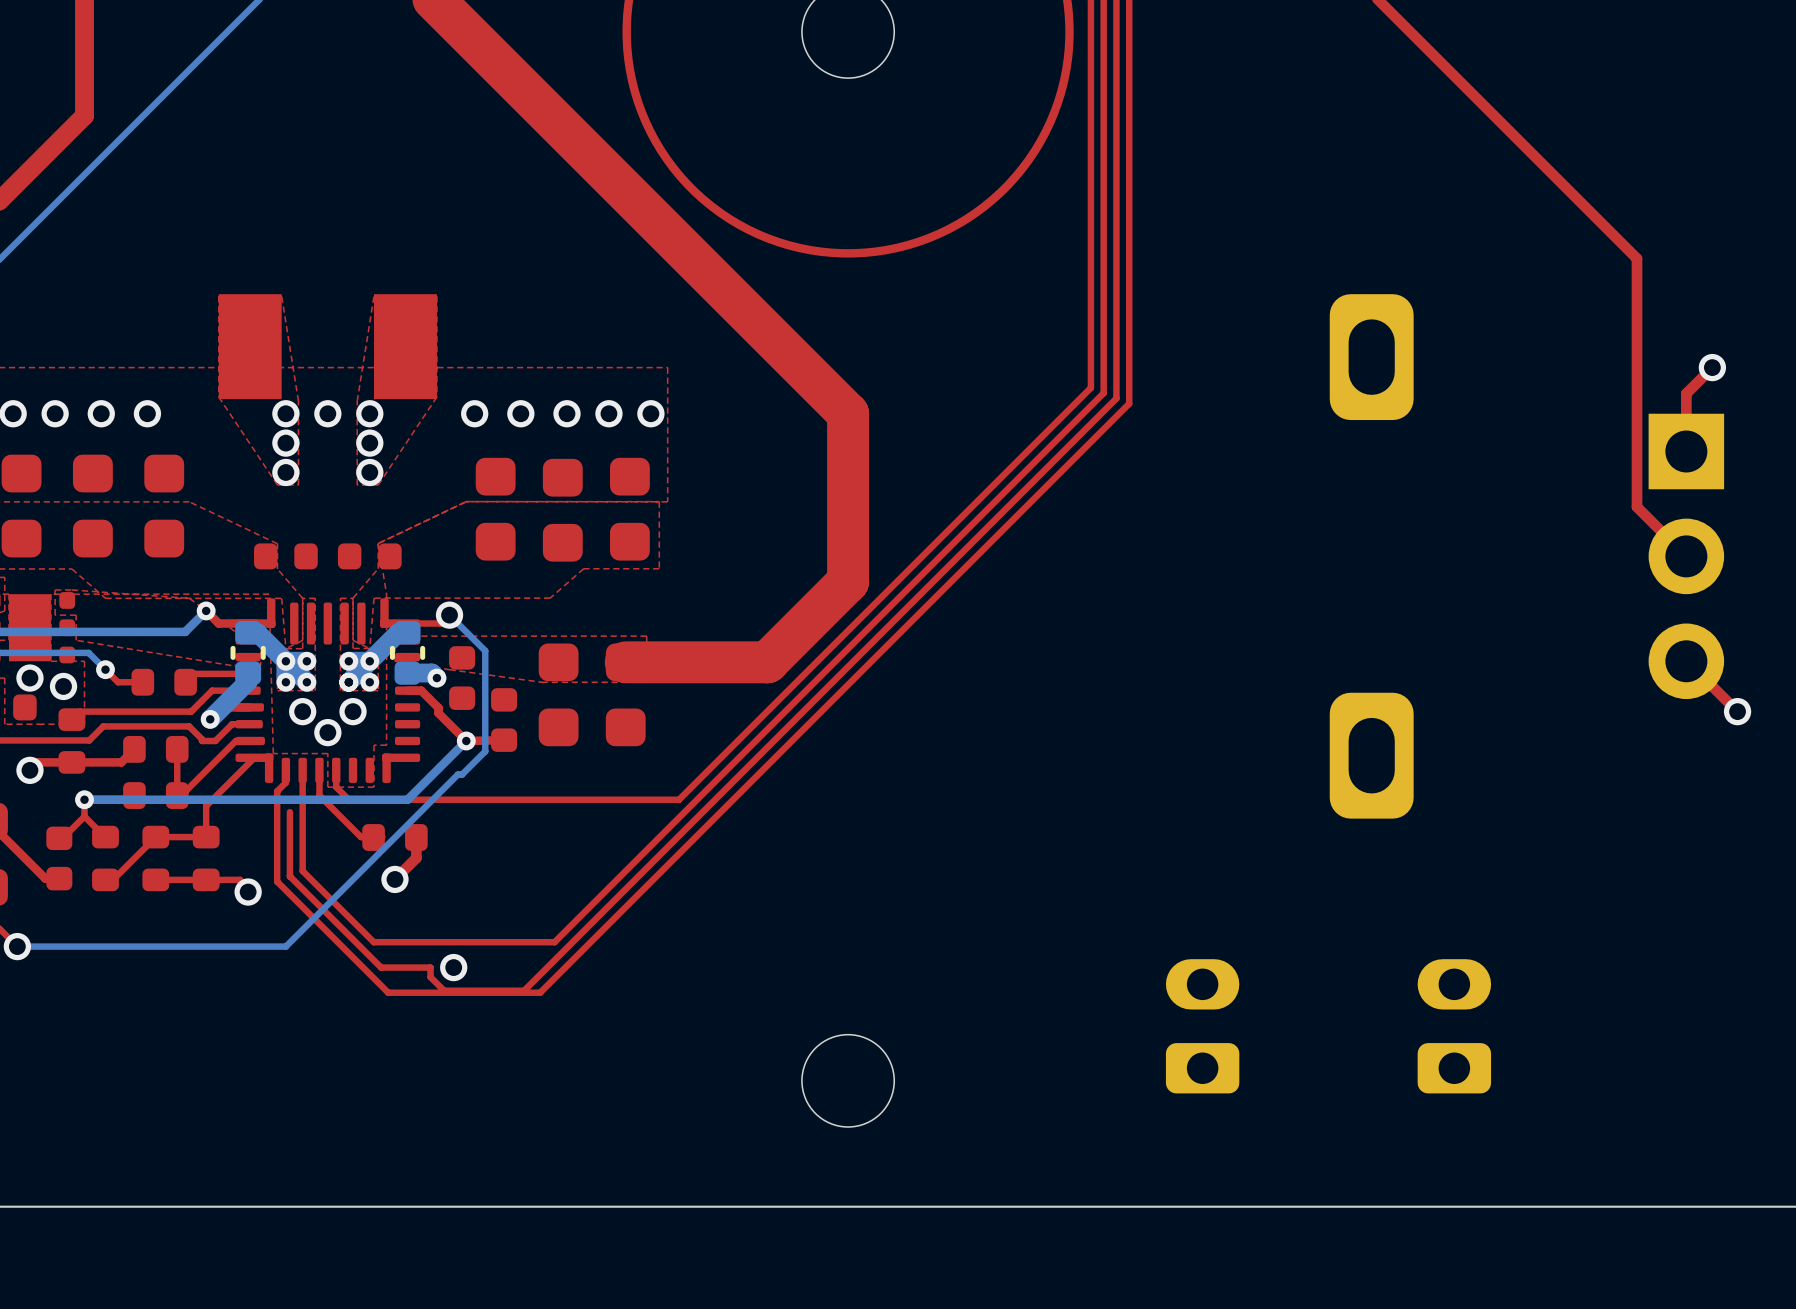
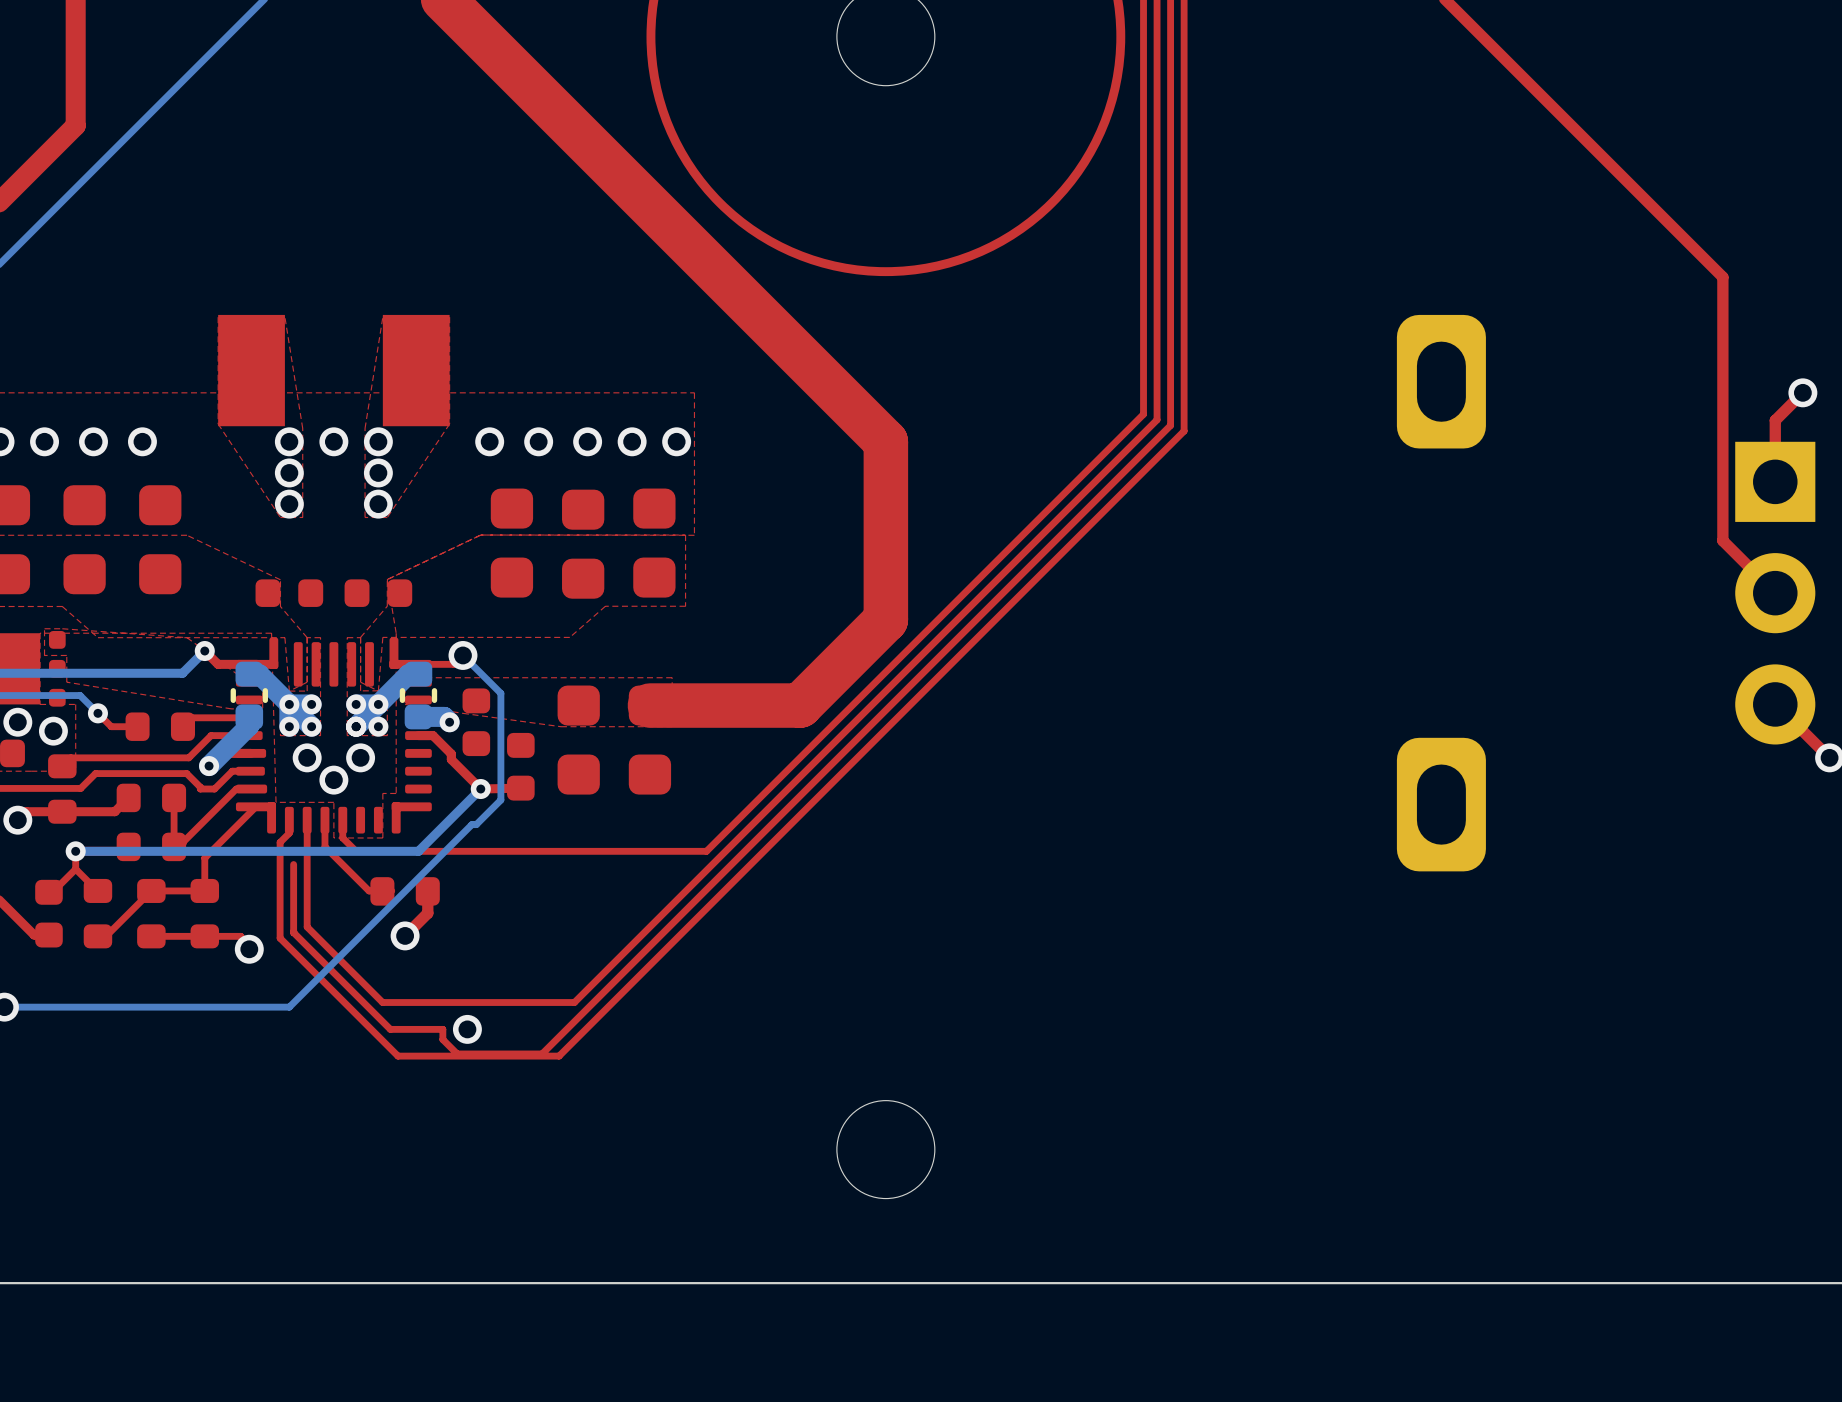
part: (1202, 1026) -> none
part: (1454, 1026) -> none

